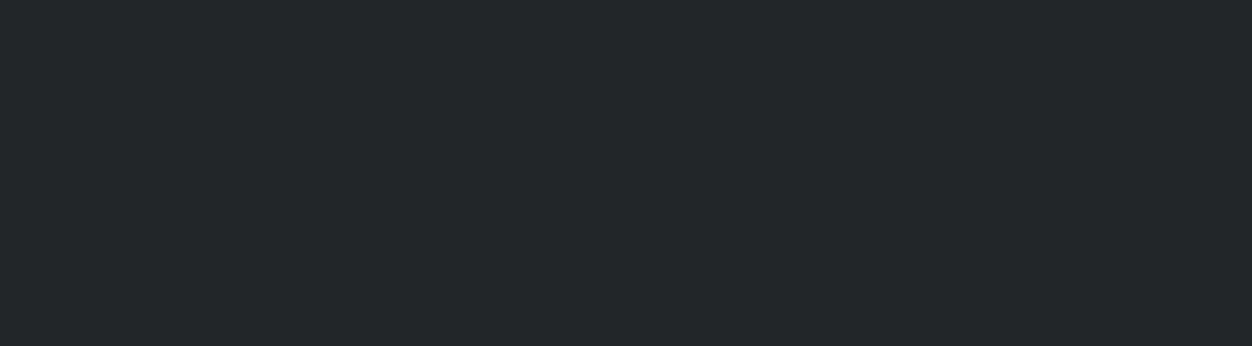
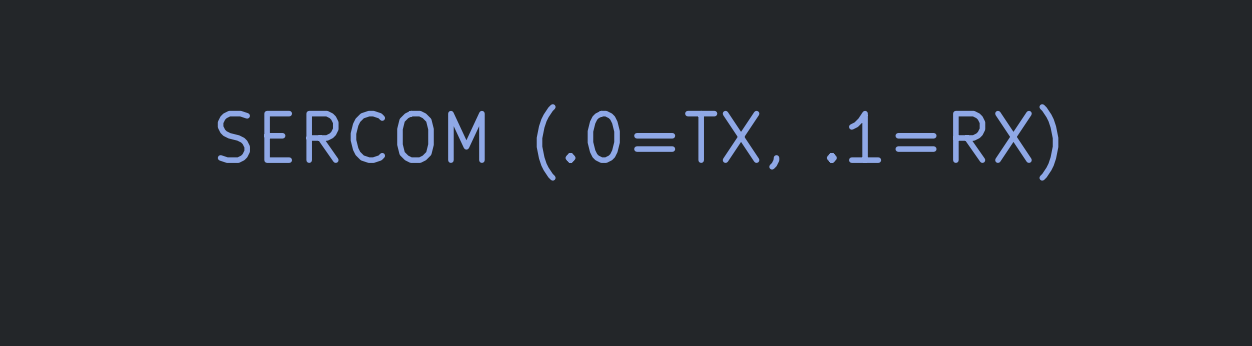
text: none -> SERCOM (.0=TX, .1=RX) (638, 142)

